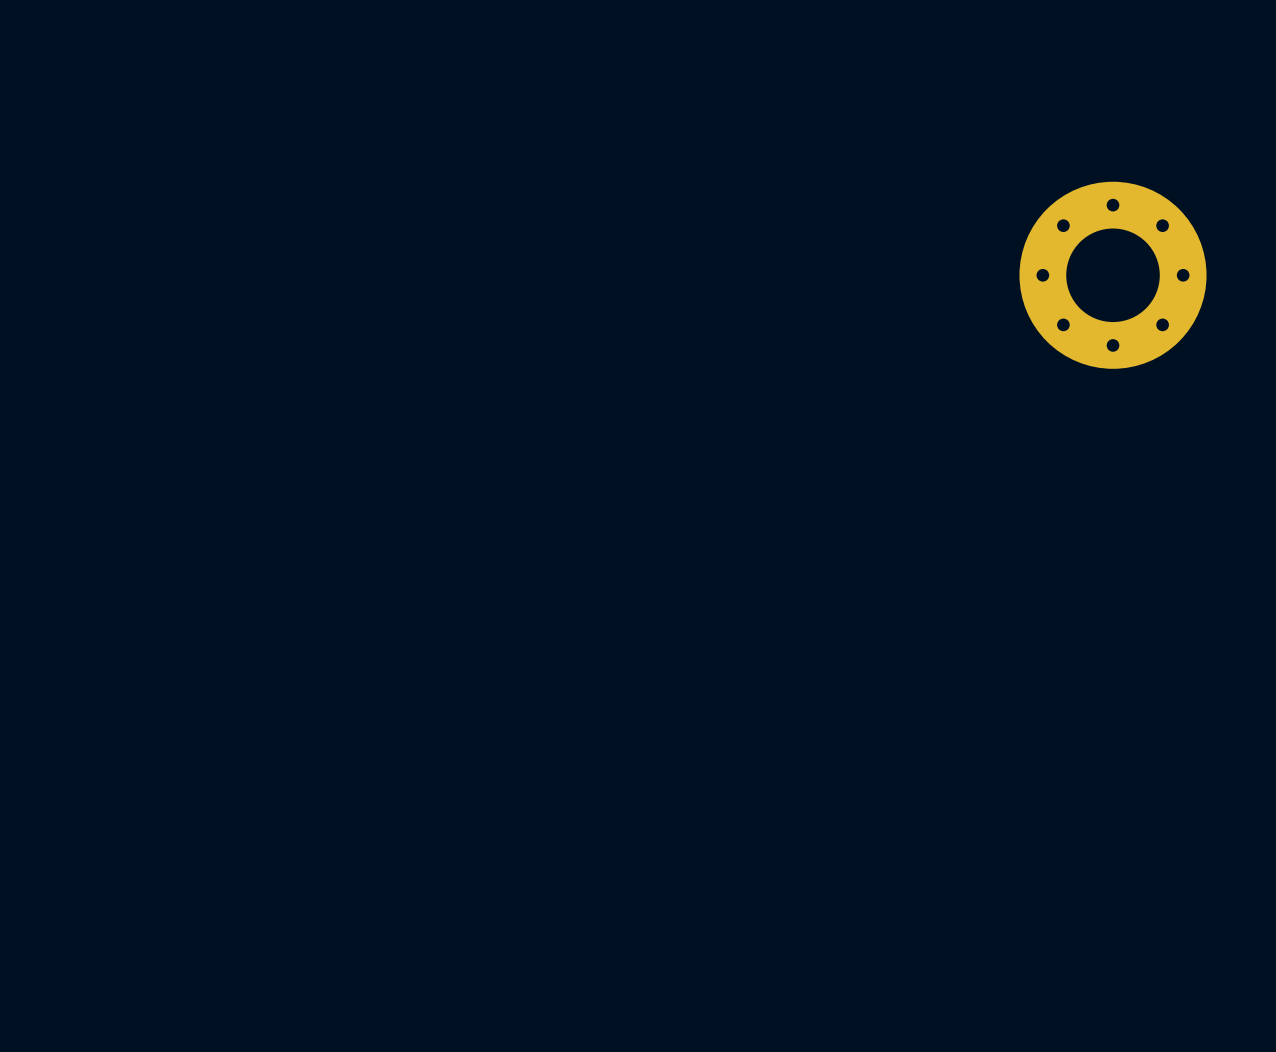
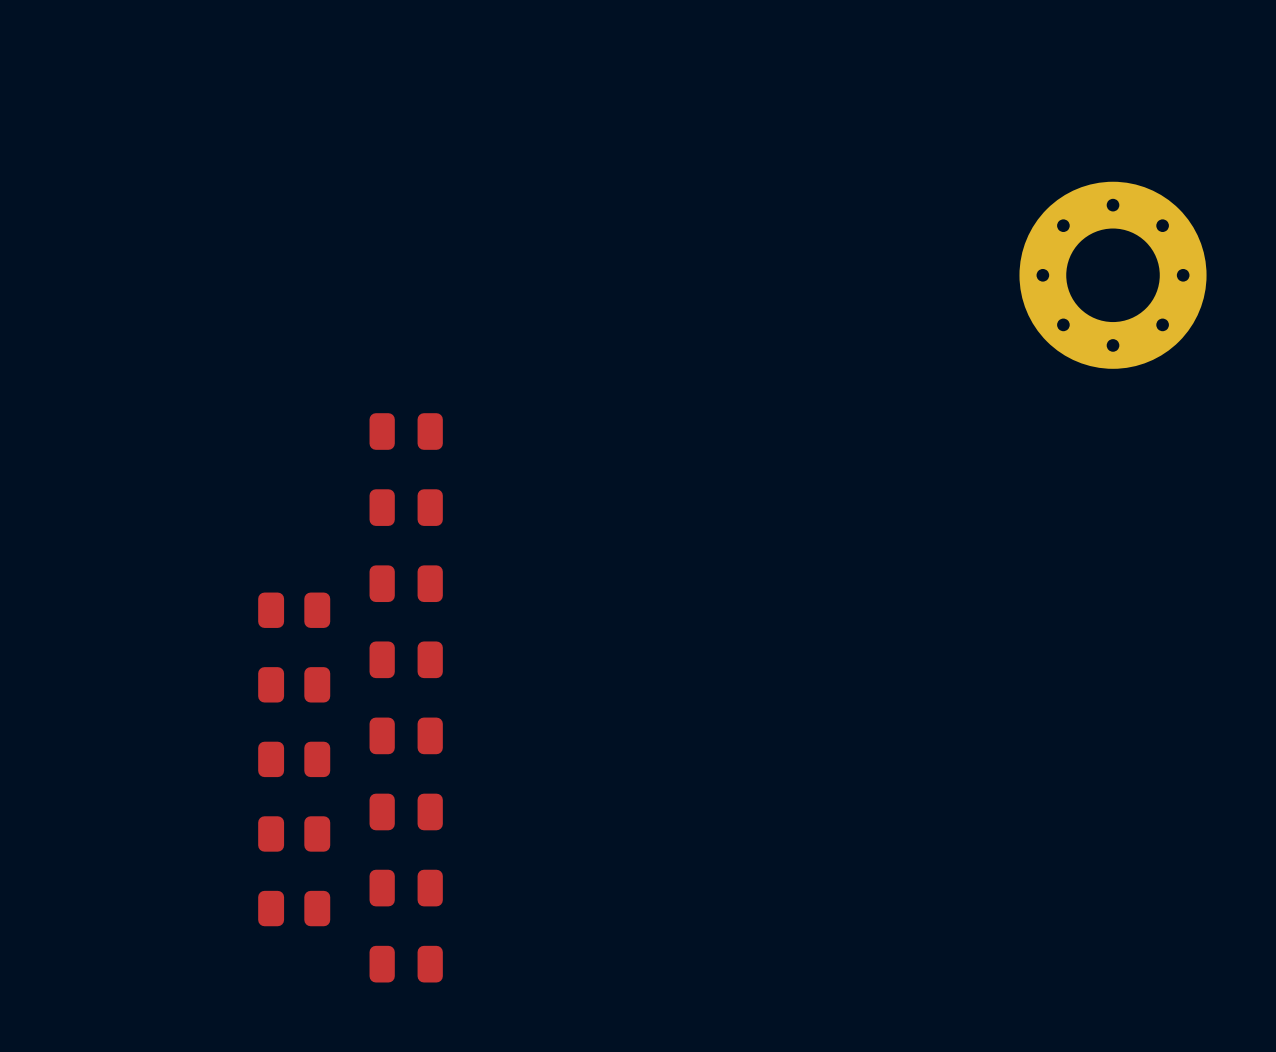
part: none -> (406, 431)
part: none -> (406, 507)
part: none -> (406, 583)
part: none -> (294, 610)
part: none -> (406, 659)
part: none -> (294, 684)
part: none -> (406, 735)
part: none -> (294, 759)
part: none -> (406, 811)
part: none -> (294, 833)
part: none -> (406, 888)
part: none -> (294, 908)
part: none -> (406, 964)

